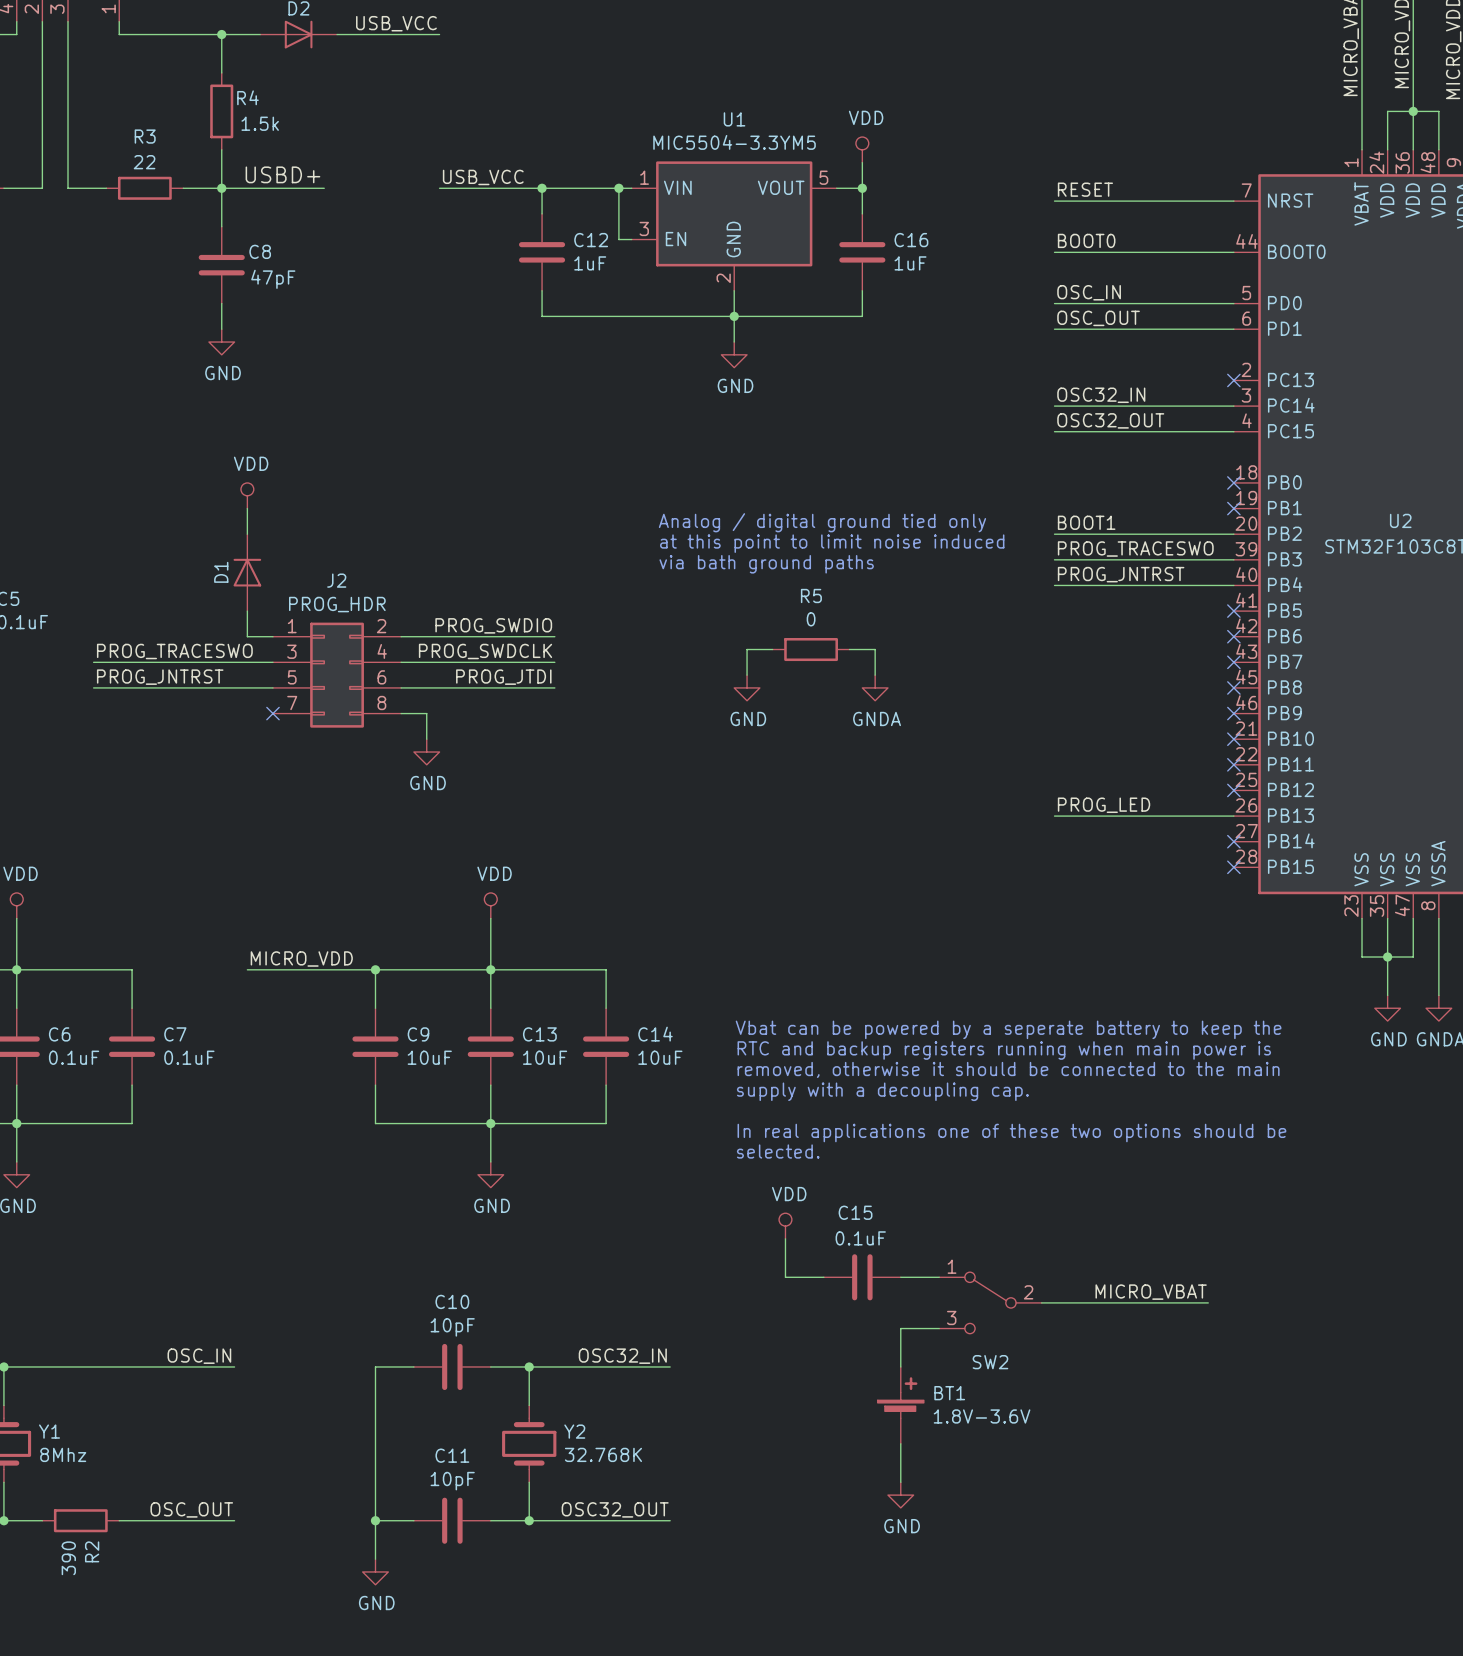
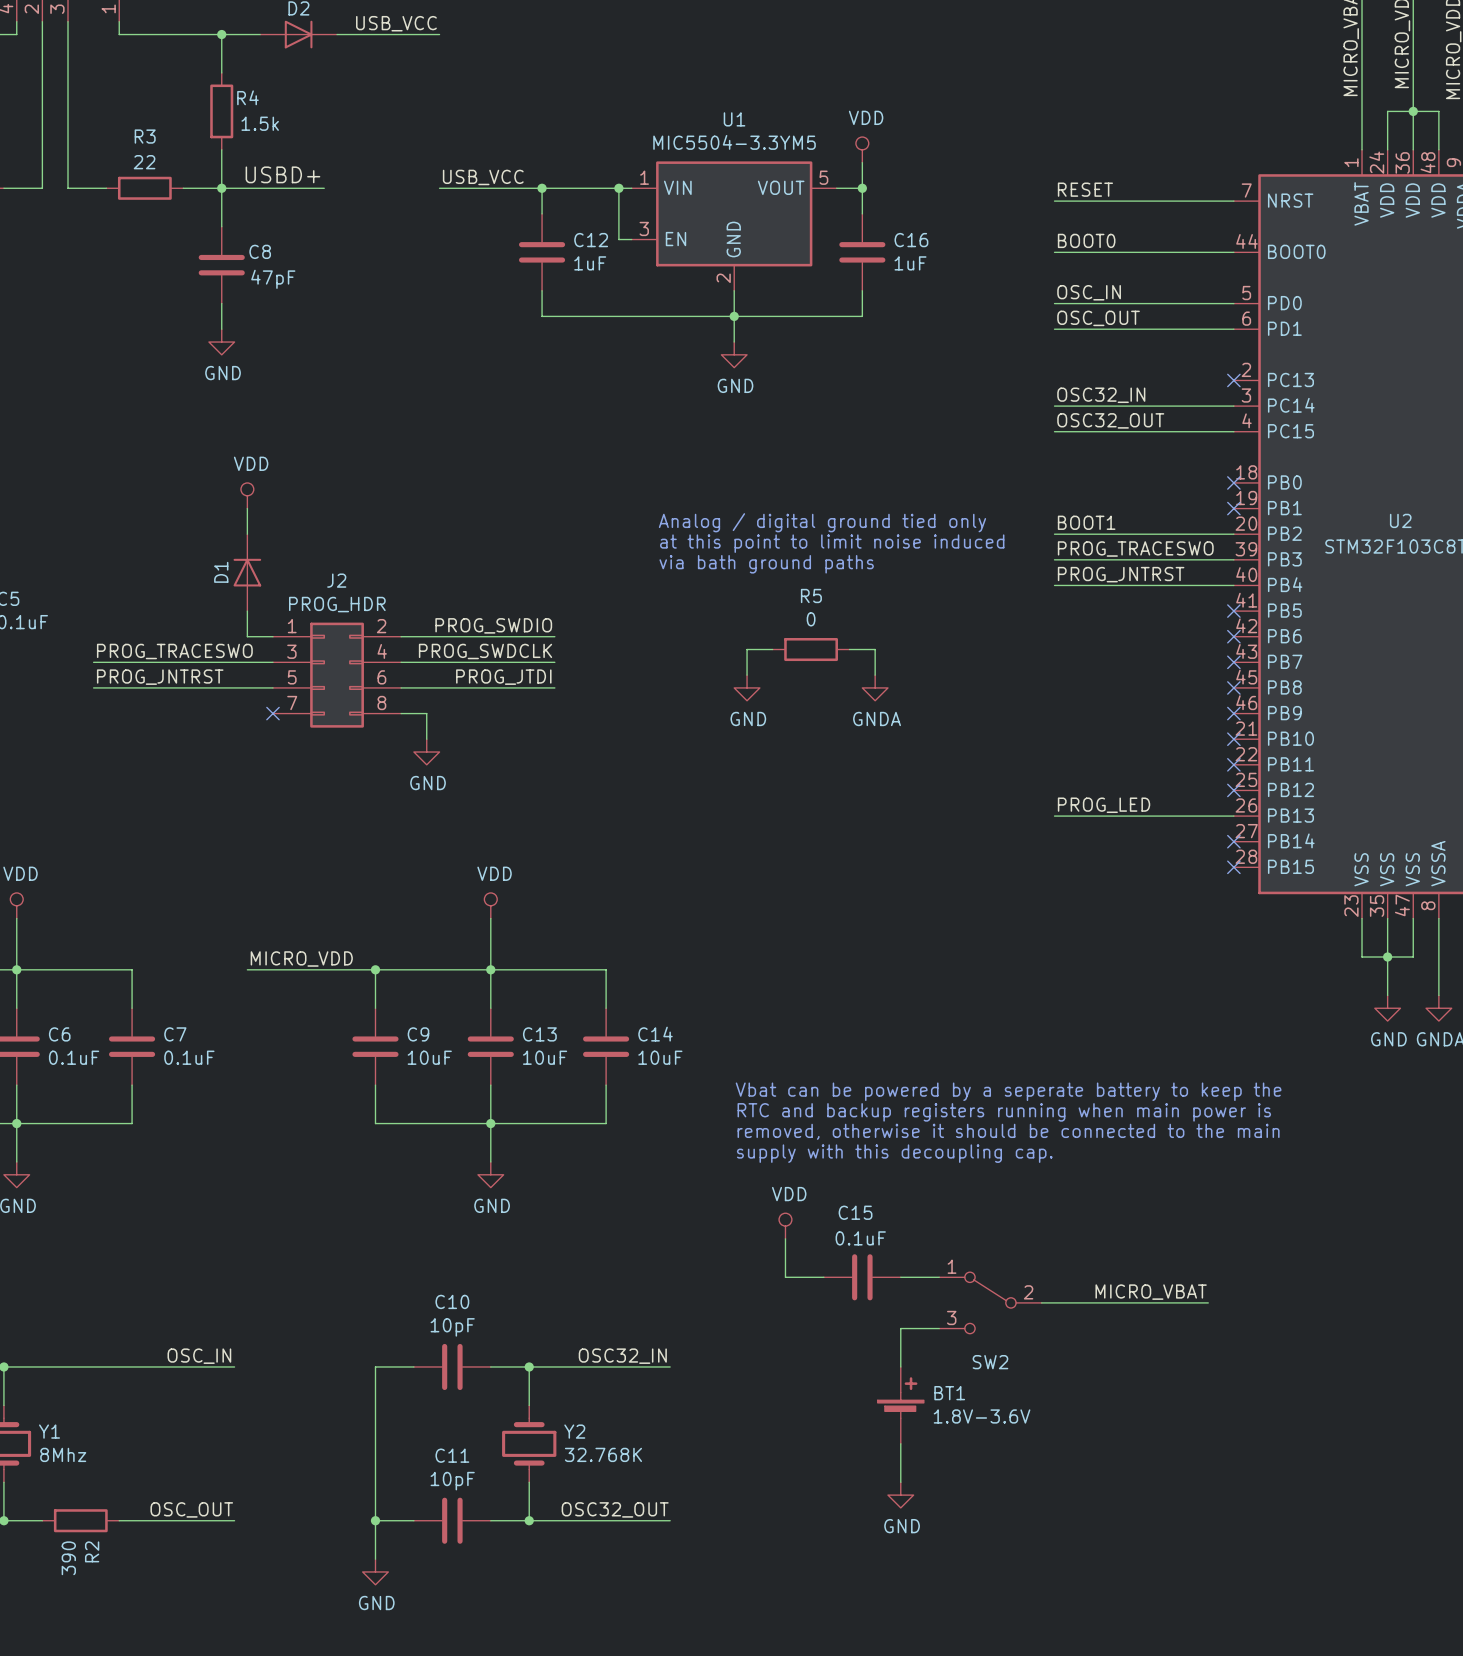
text: Vbat can be powered by a seperate battery to keep the (1008, 1029) -> none
text position: RTC and backup registers running when main power is (1004, 1050) -> RTC and backup registers running when main power is (1004, 1112)
text: removed, otherwise it should be connected to the main (1008, 1069) -> none
text: supply with a decoupling cap. (882, 1091) -> Vbat can be powered by a seperate battery to keep the (1008, 1091)
text: In real applications one of these two options should be (1011, 1133) -> removed, otherwise it should be connected to the main (1008, 1131)
text: selected. (778, 1151) -> supply with this decoupling cap. (894, 1153)

